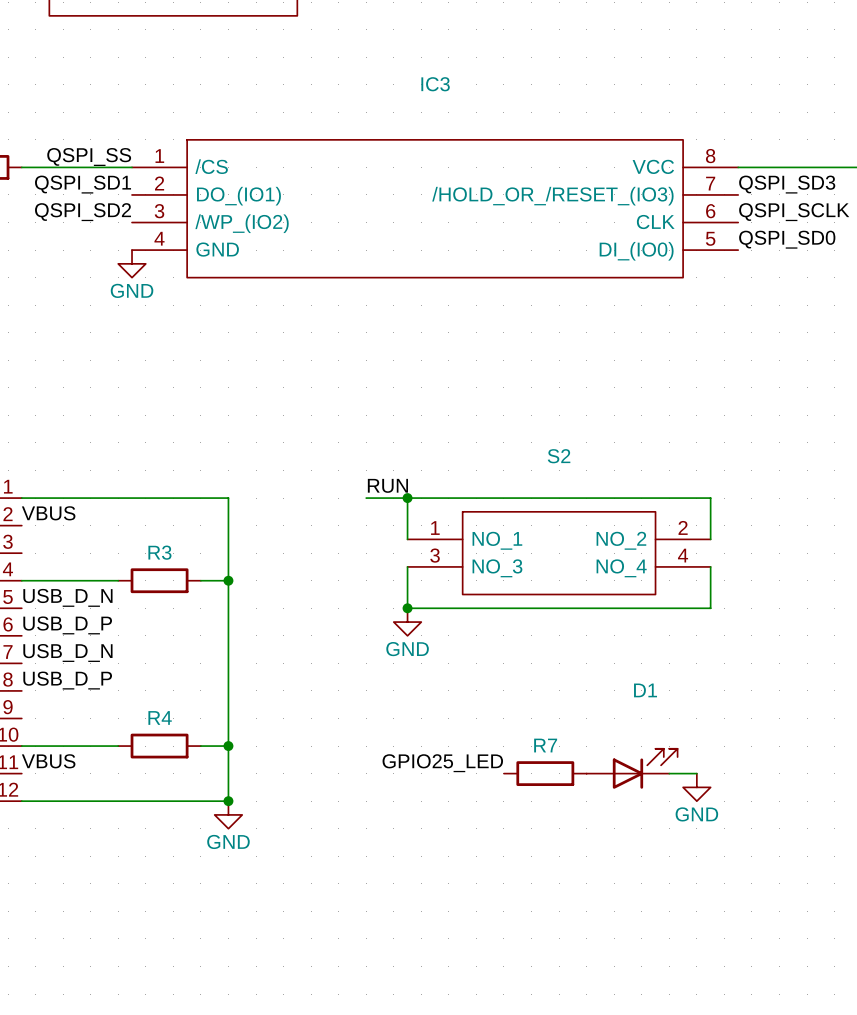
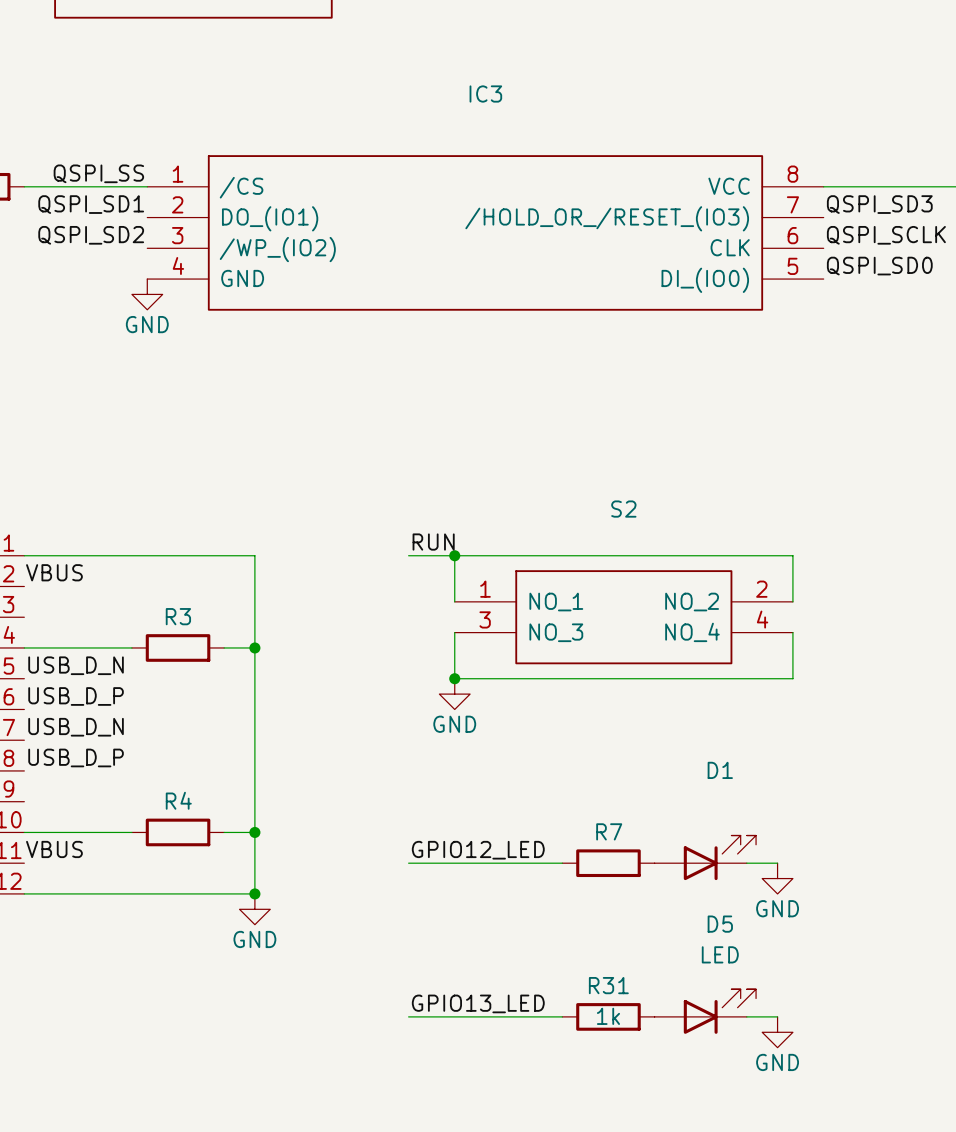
label: GPIO25_LED (442, 763) -> GPIO12_LED (478, 850)
wire: none -> (408, 863) (562, 863)
label: none -> GPIO13_LED (478, 1003)
D5: none -> LED (705, 1011)
wire: none -> (408, 1016) (562, 1016)
R31: none -> 1k (608, 1016)
wire: none -> (746, 1016) (777, 1016)
power symbol: none -> GND (777, 1032)

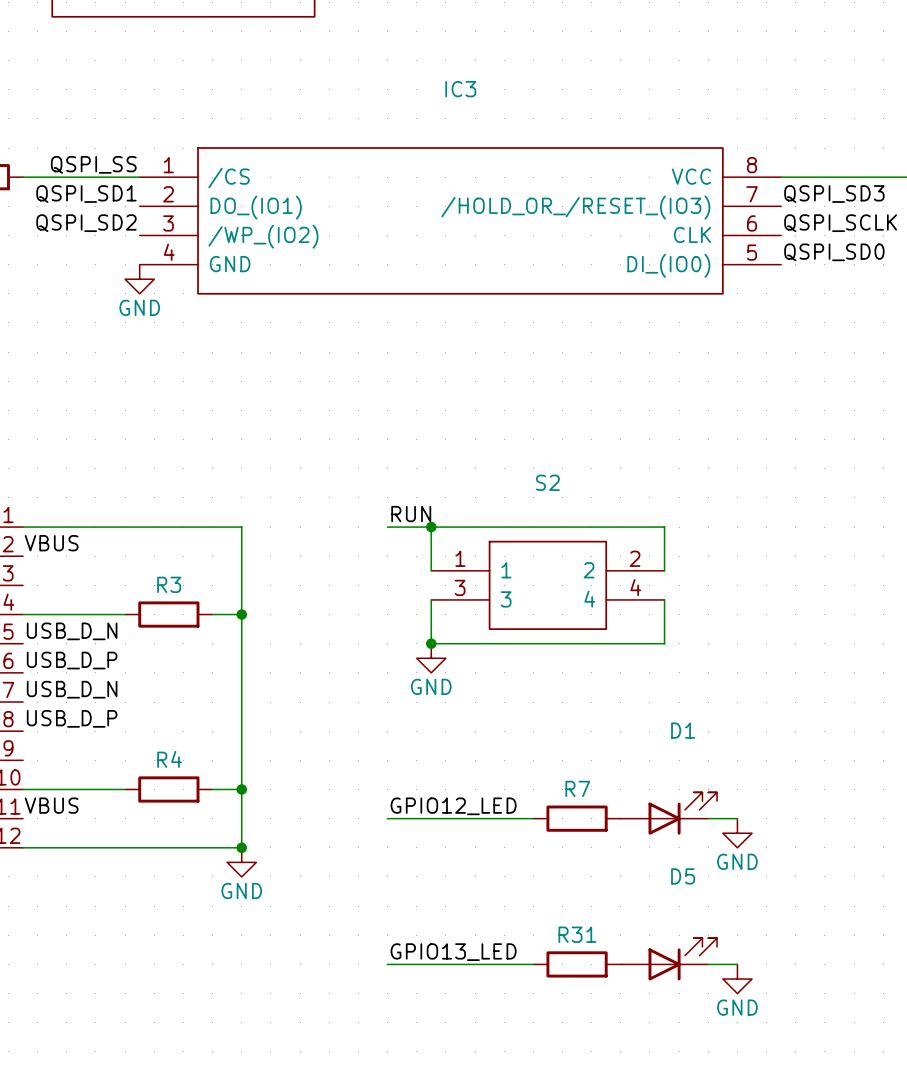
wire: (700, 555) (792, 555) (792, 601) -> (664, 527) (664, 570)
S2 symbol: [454, 570, 793, 665] -> [431, 540, 665, 630]
wire: (792, 632) (792, 678) (700, 678) -> (664, 599) (664, 643)
D5 value: LED (720, 954) -> none
R31 value: 1k (608, 1016) -> none

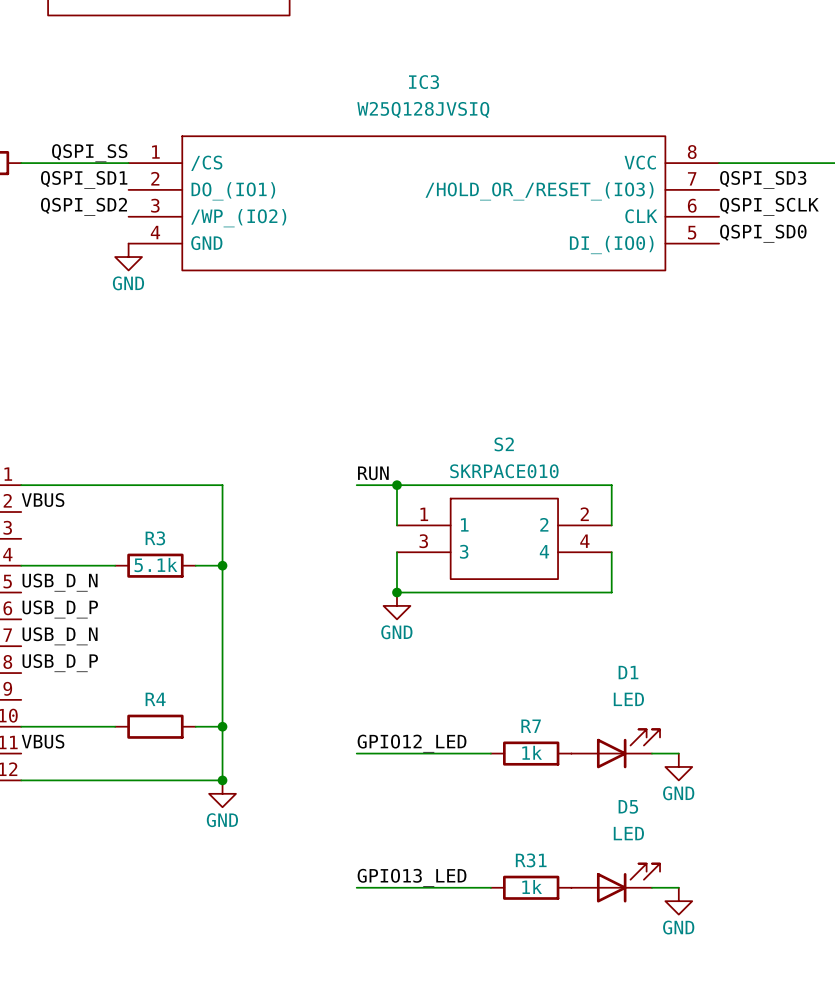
IC3 value: none -> W25Q128JVSIQ (423, 109)
S2 value: none -> SKRPACE010 (504, 471)
R3 value: none -> 5.1k (155, 565)
D1 value: none -> LED (628, 699)
R7 value: none -> 1k (532, 752)
D5 value: none -> LED (628, 833)
R31 value: none -> 1k (532, 886)

